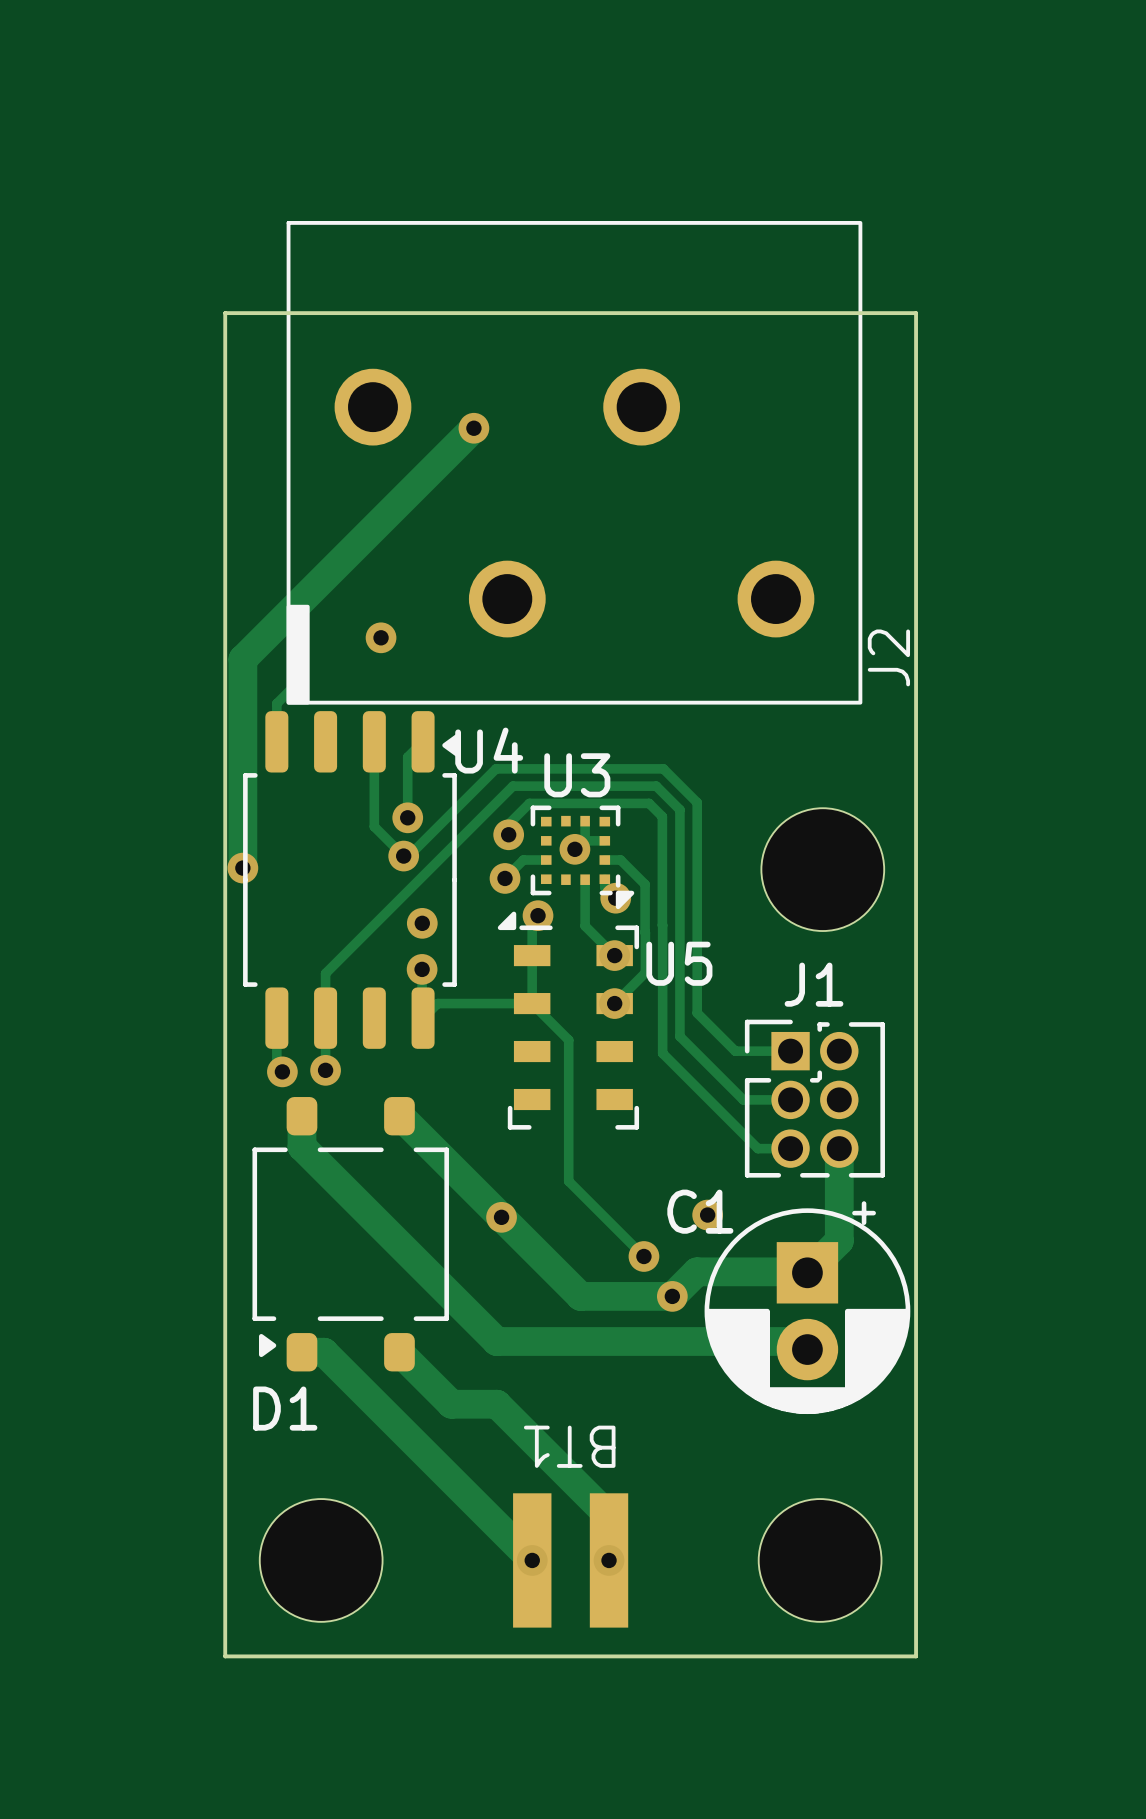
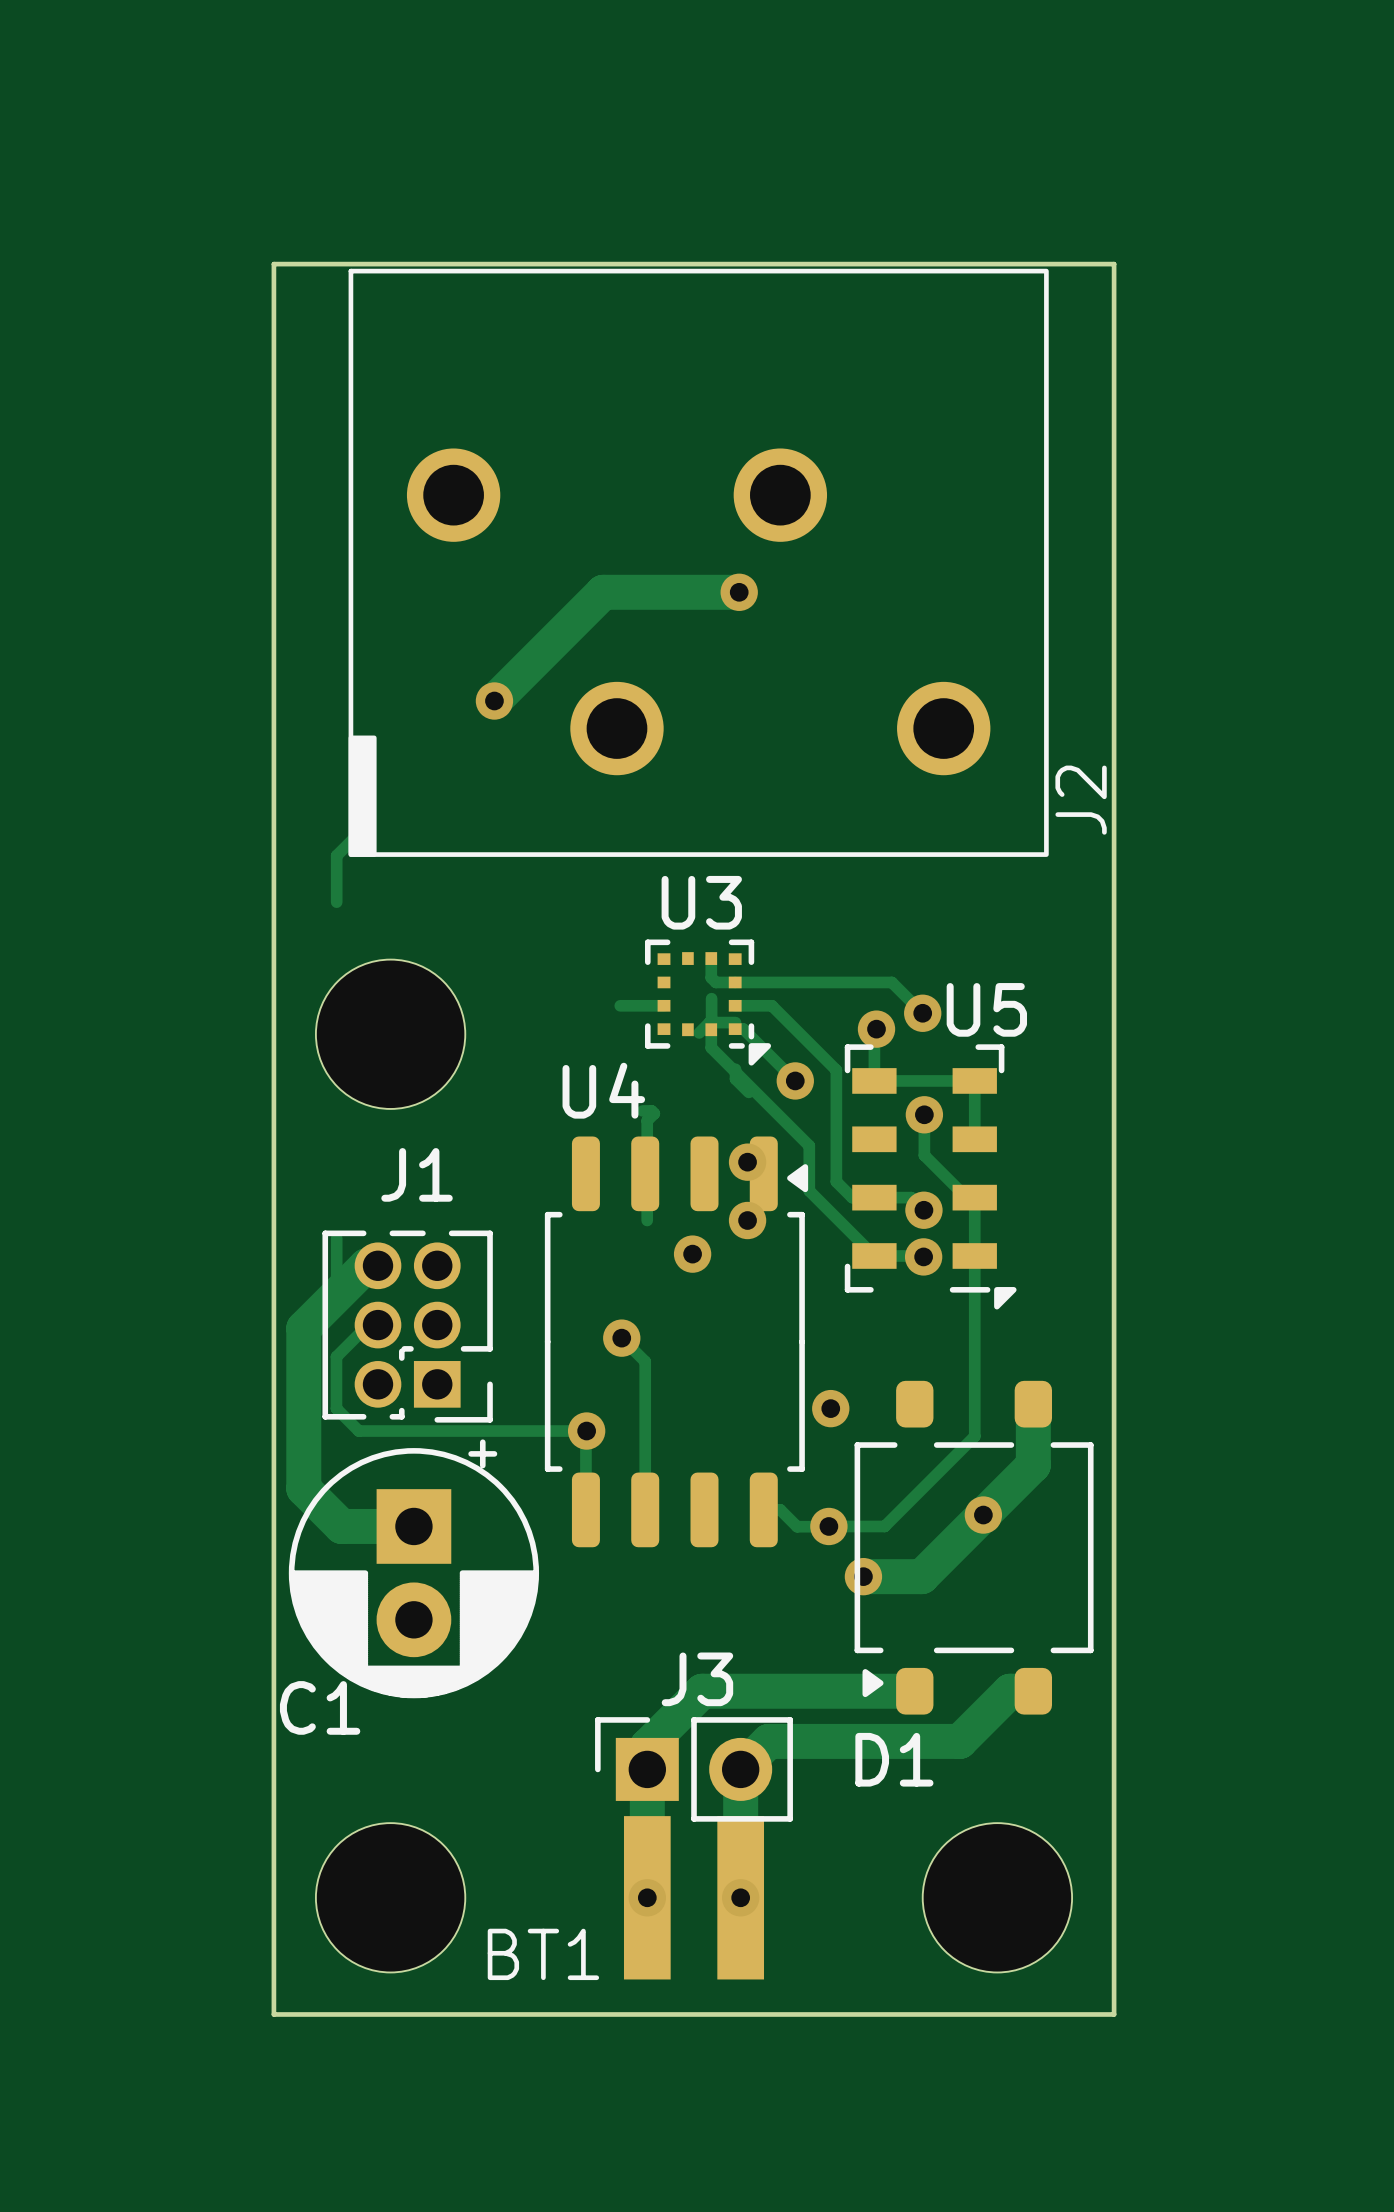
board edge: (225, 313) (916, 313) -> (273, 380) (273, 264) (1114, 264) (1114, 380)
track: (473, 428) (242, 659) (242, 868) -> none
via: (473, 428) -> none
track: none -> (739, 592) (603, 592) (494, 701)
via: none -> (739, 592)
via position: (381, 637) -> (494, 701)
track: (374, 741) (374, 826) (403, 856) (408, 856) (496, 768) (663, 768) (697, 802) (697, 1013) (735, 1051) (790, 1051) -> none
track: (423, 741) (407, 757) (407, 817) -> none
U4 name position: U4 (489, 750) -> U4 (603, 1090)
track: none -> (711, 958) (711, 977) (715, 982) (891, 982) (922, 1013)
via: (407, 817) -> none
track: none -> (620, 1005) (664, 1005)
track: none -> (735, 1005) (771, 1005) (836, 1070) (836, 1181) (852, 1197) (911, 1197) (923, 1210)
via: none -> (922, 1013)
track: (508, 834) (508, 824) (529, 803) (649, 803) (662, 816) (662, 925) -> none
via: (508, 834) -> none
track: none -> (711, 1029) (711, 1047) (809, 1145) (809, 1190) (874, 1255) (923, 1256)
track: none -> (735, 1029) (743, 1029) (795, 1080)
track: none -> (876, 1029) (874, 1031) (874, 1080) (974, 1080) (974, 1139)
via: none -> (876, 1029)
via: (574, 849) -> none
via: (403, 856) -> none
U3 position: (582, 857) -> (708, 1002)
track: (546, 860) (523, 860) (505, 878) -> none
track: (604, 860) (620, 860) (645, 884) (645, 932) -> none
via: (242, 868) -> none
part position: (822, 869) -> (390, 1034)
via: (505, 878) -> none
U4 position: (351, 879) -> (676, 1341)
track: (585, 879) (585, 926) (614, 955) -> none
via position: (615, 898) -> (795, 1080)
via: (538, 915) -> none
track: none -> (924, 1114) (924, 1155) (974, 1205) (974, 1436) (884, 1526) (797, 1526) (780, 1509) (763, 1509)
via: none -> (924, 1114)
via: (422, 923) -> none
track: (662, 925) (662, 1053) (757, 1148) (790, 1148) -> none
track: (645, 932) (645, 972) (614, 1003) -> none
U5 name position: U5 (679, 963) -> U5 (986, 1009)
track: (422, 969) (423, 1018) (437, 1003) (532, 1003) (568, 1040) (568, 1181) (643, 1256) -> none
via: (422, 969) -> none
via: none -> (923, 1210)
U5 rotation: 0° (568, 1020) -> 180° (930, 1176)
U5 position: (568, 1020) -> (930, 1176)
via: none -> (692, 1254)
via: none -> (923, 1256)
track: none -> (378, 1265) (366, 1265) (303, 1328) (303, 1488) (341, 1526) (413, 1526)
track: (325, 1070) (325, 973) (512, 786) (656, 786) (679, 809) (679, 1036) (743, 1099) (790, 1099) -> none
via: (325, 1070) -> none
via: (282, 1071) -> none
track: none -> (378, 1325) (368, 1325) (336, 1356) (336, 1408) (358, 1431) (586, 1431) (585, 1509)
J1 rotation: 0° (814, 1098) -> 180° (407, 1326)
J1 position: (814, 1098) -> (407, 1326)
track: none -> (621, 1338) (645, 1361) (645, 1509)
via: none -> (621, 1338)
track: (301, 1116) (301, 1146) (496, 1341) (799, 1341) (807, 1349) -> none
track: (399, 1116) (580, 1296) (672, 1296) (696, 1271) (807, 1272) (839, 1240) (839, 1148) -> none
track: none -> (1033, 1404) (1033, 1465) (921, 1576) (863, 1576)
via: none -> (830, 1408)
C1 name position: C1 (700, 1211) -> C1 (320, 1707)
via: (707, 1215) -> none
via position: (501, 1217) -> (586, 1431)
D1 position: (350, 1234) -> (974, 1547)
via: none -> (983, 1515)
via: none -> (828, 1526)
via: (643, 1256) -> none
via: (672, 1296) -> none
via: none -> (863, 1576)
C1 position: (807, 1307) -> (413, 1568)
track: (301, 1352) (324, 1352) (532, 1560) -> (914, 1691) (702, 1691) (647, 1746) (647, 1897)
track: (399, 1352) (451, 1404) (496, 1404) (609, 1516) (609, 1560) -> none
track: none -> (1033, 1691) (1010, 1691) (959, 1741) (768, 1741) (740, 1769) (740, 1839)
BT1 name rotation: 0° (569, 1446) -> 180° (543, 1954)
BT1 name position: BT1 (569, 1446) -> BT1 (543, 1954)
J3: none -> (694, 1769)

